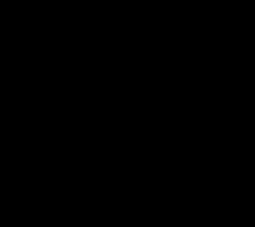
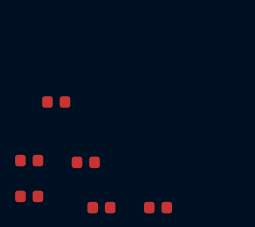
part: none -> (56, 101)
part: none -> (29, 160)
part: none -> (85, 162)
part: none -> (29, 196)
part: none -> (101, 207)
part: none -> (158, 207)

